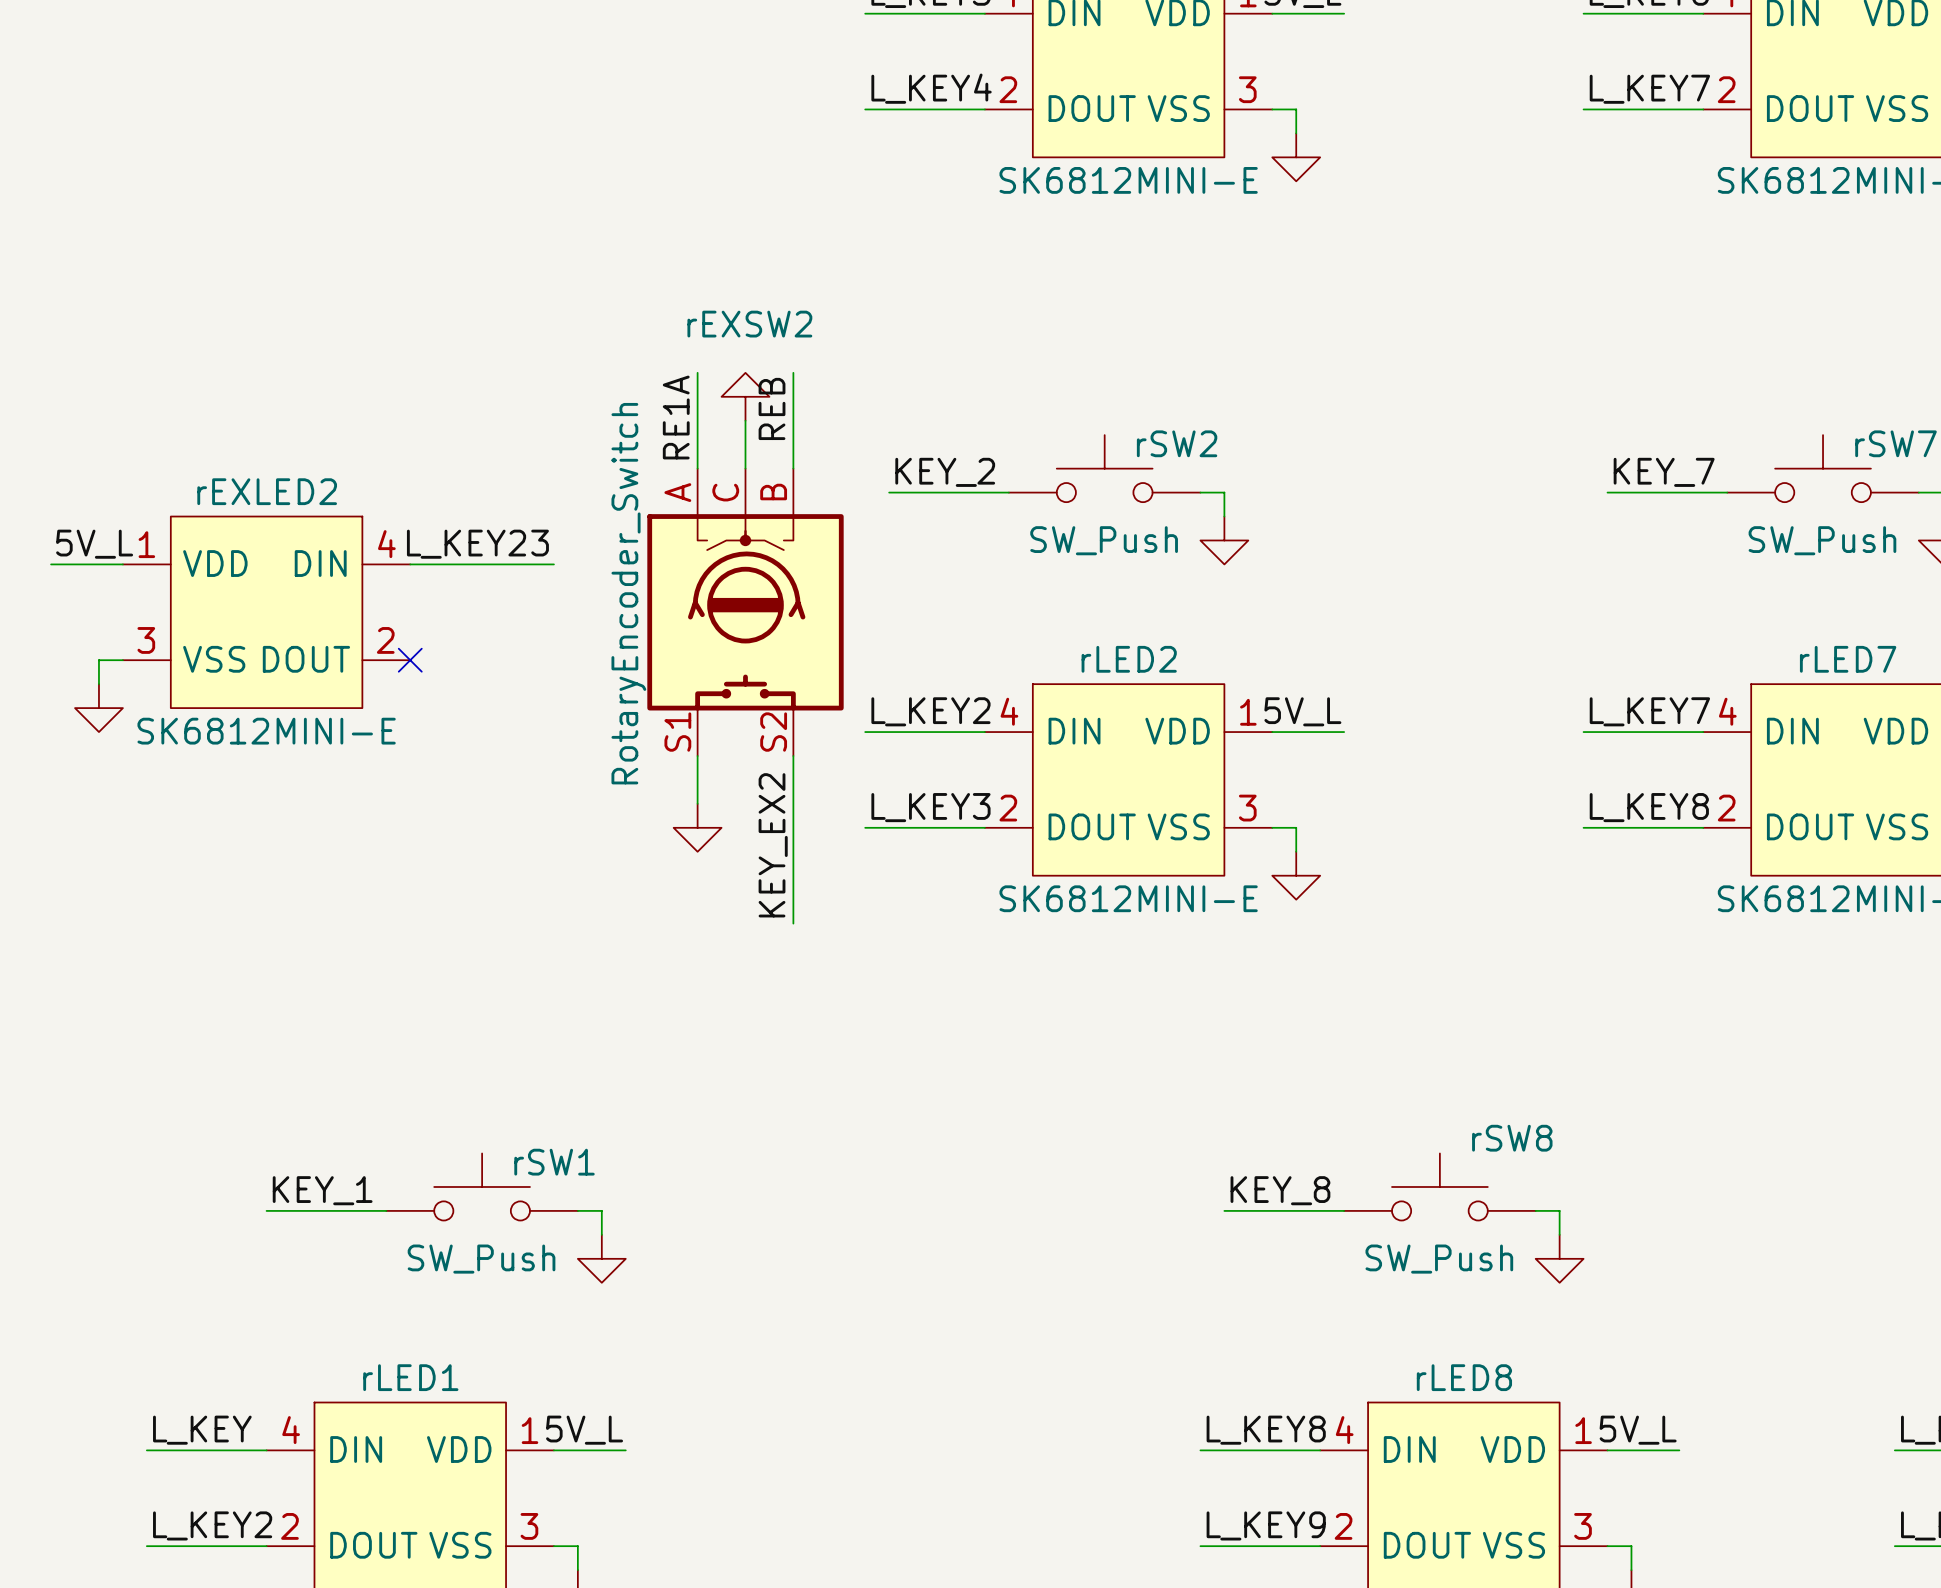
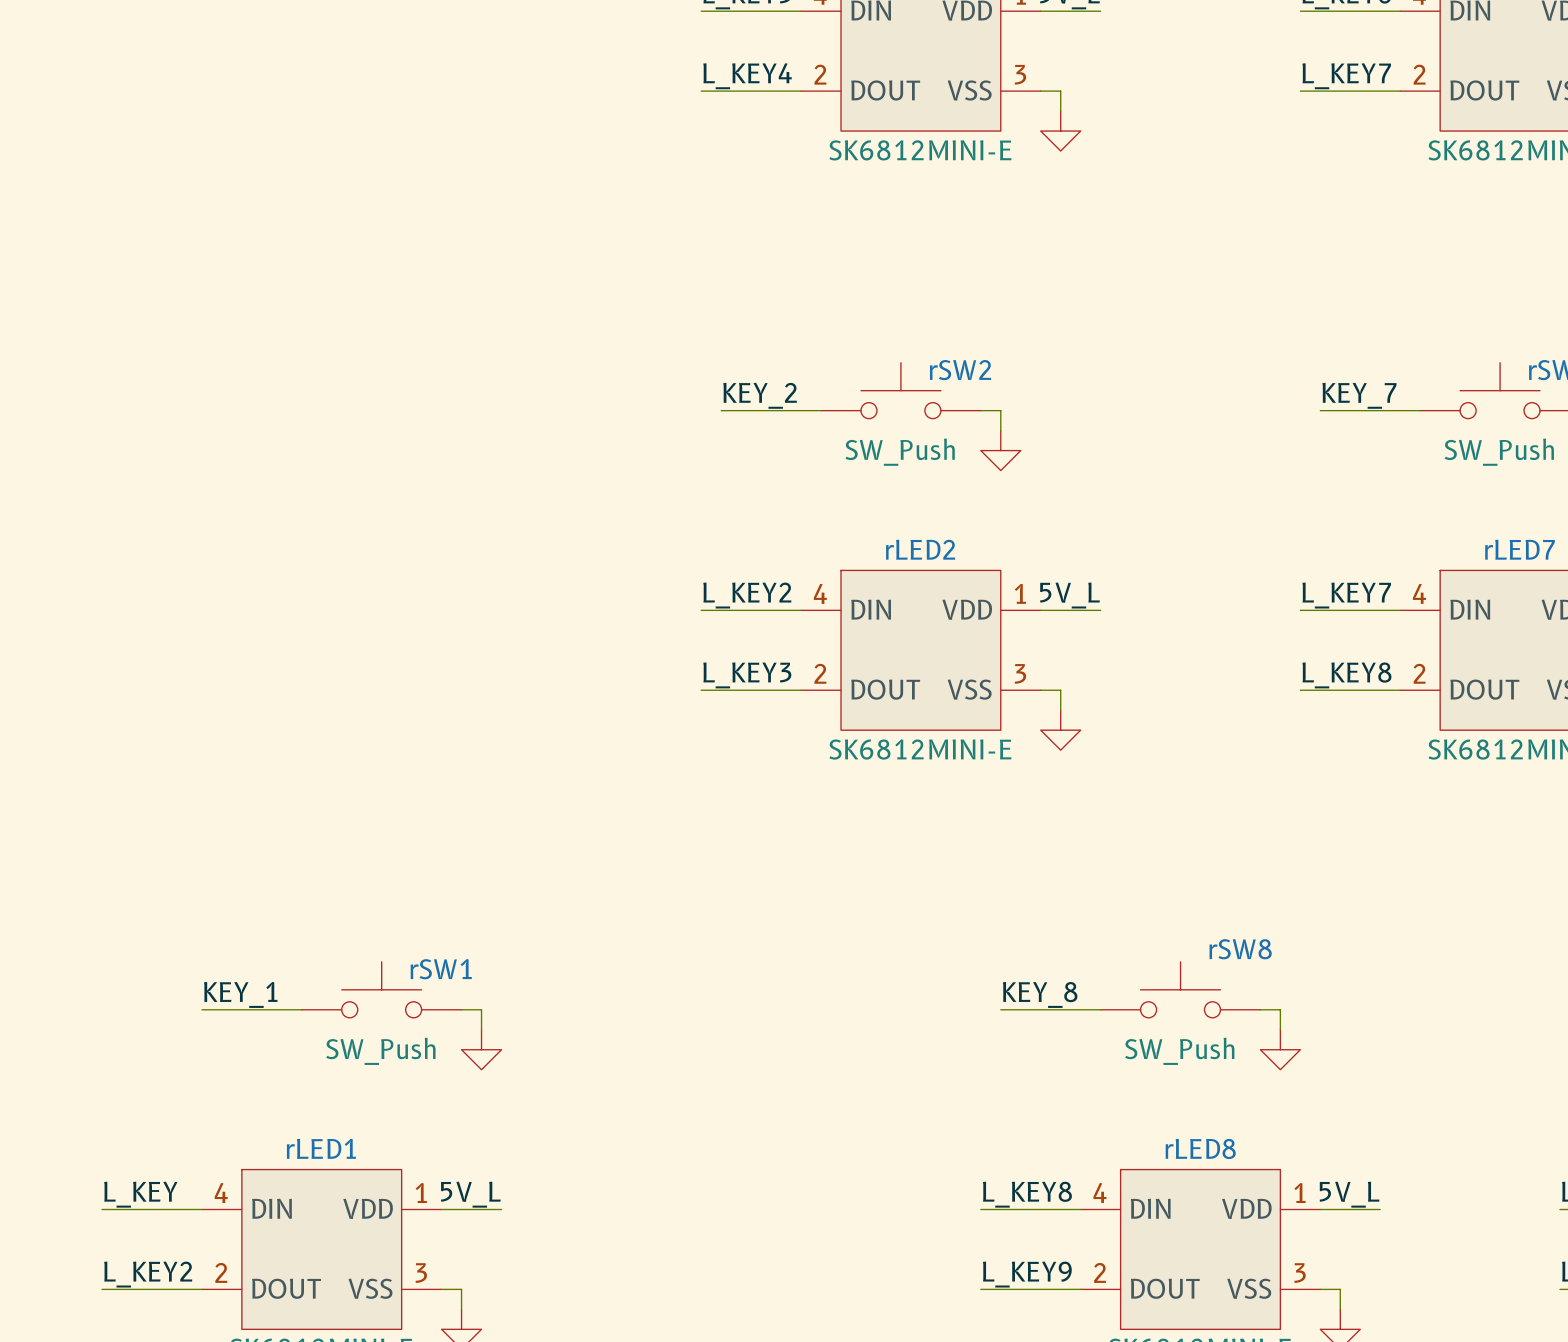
wire: (697, 372) (697, 468) -> none
wire: (793, 372) (793, 468) -> none
power symbol: (745, 396) -> none
label: REB (772, 408) -> none
label: RE1A (676, 417) -> none
wire: (745, 420) (745, 468) -> none
label: 5V_L (94, 544) -> none
label: L_KEY23 (477, 544) -> none
wire: (51, 564) (122, 564) -> none
wire: (410, 564) (553, 564) -> none
rEXLED2: SK6812MINI-E (266, 612) -> none
rEXSW2: RotaryEncoder_Switch (745, 612) -> none
wire: (122, 660) (98, 660) (98, 684) -> none
no-connect mark: (410, 660) -> none
power symbol: (98, 708) -> none
wire: (697, 755) (697, 803) -> none
wire: (793, 755) (793, 923) -> none
power symbol: (697, 827) -> none
label: KEY_EX2 (773, 845) -> none

